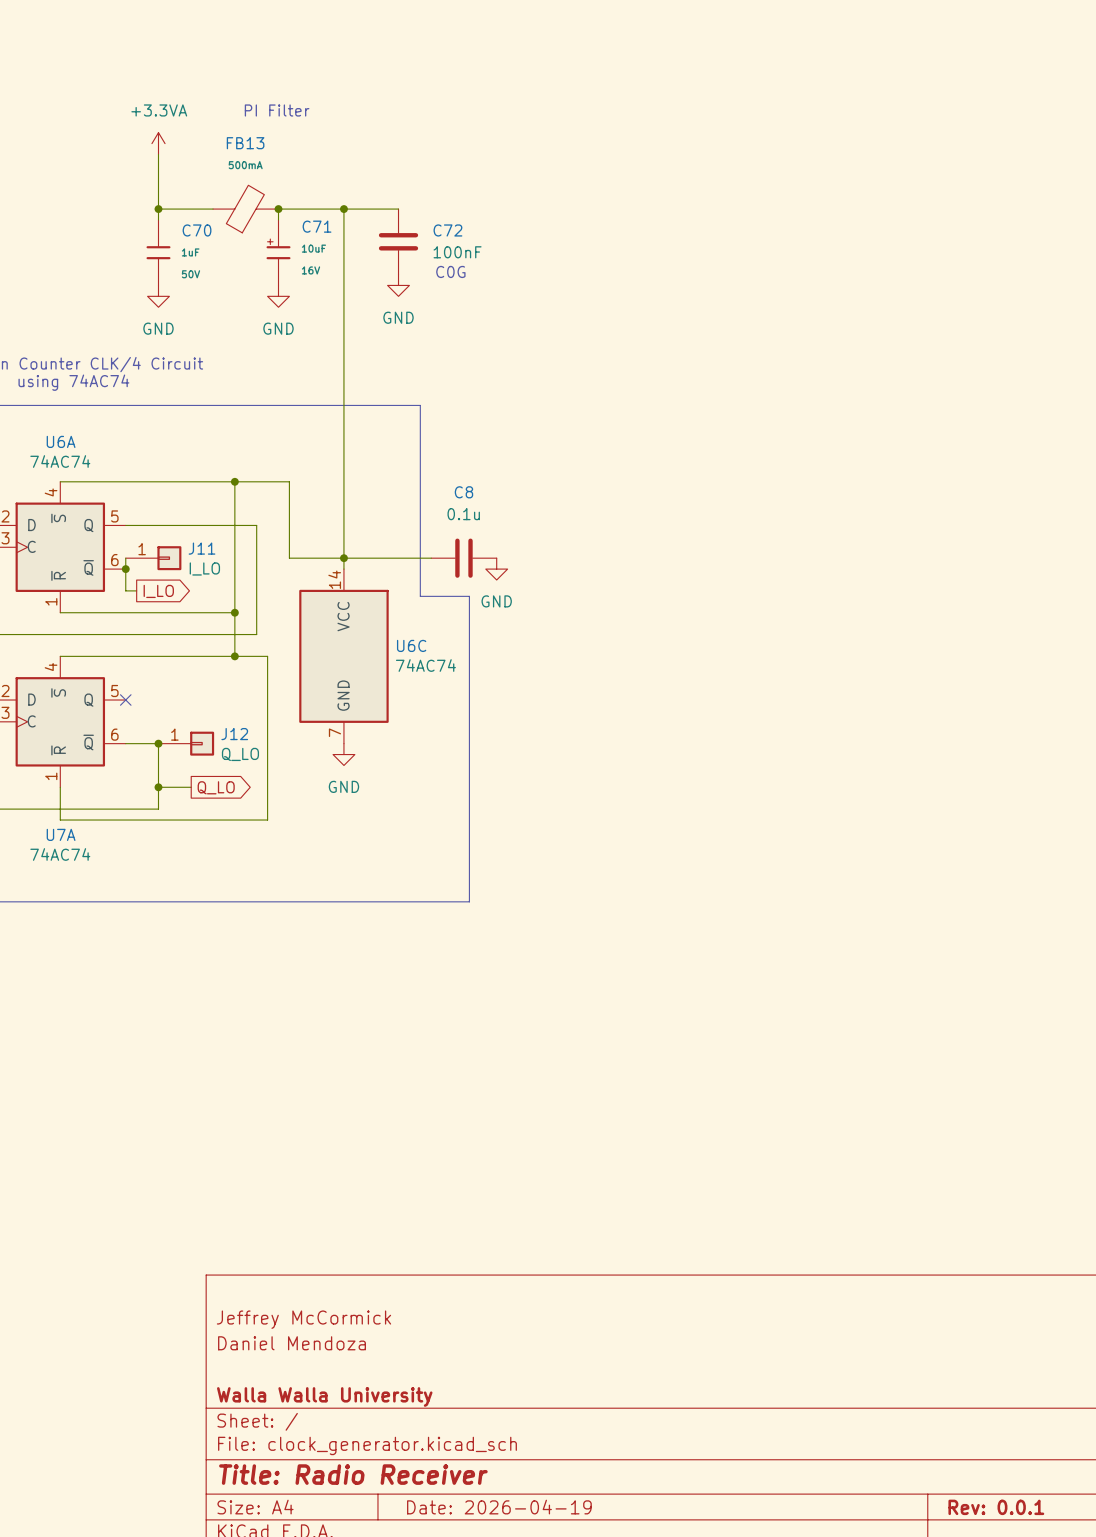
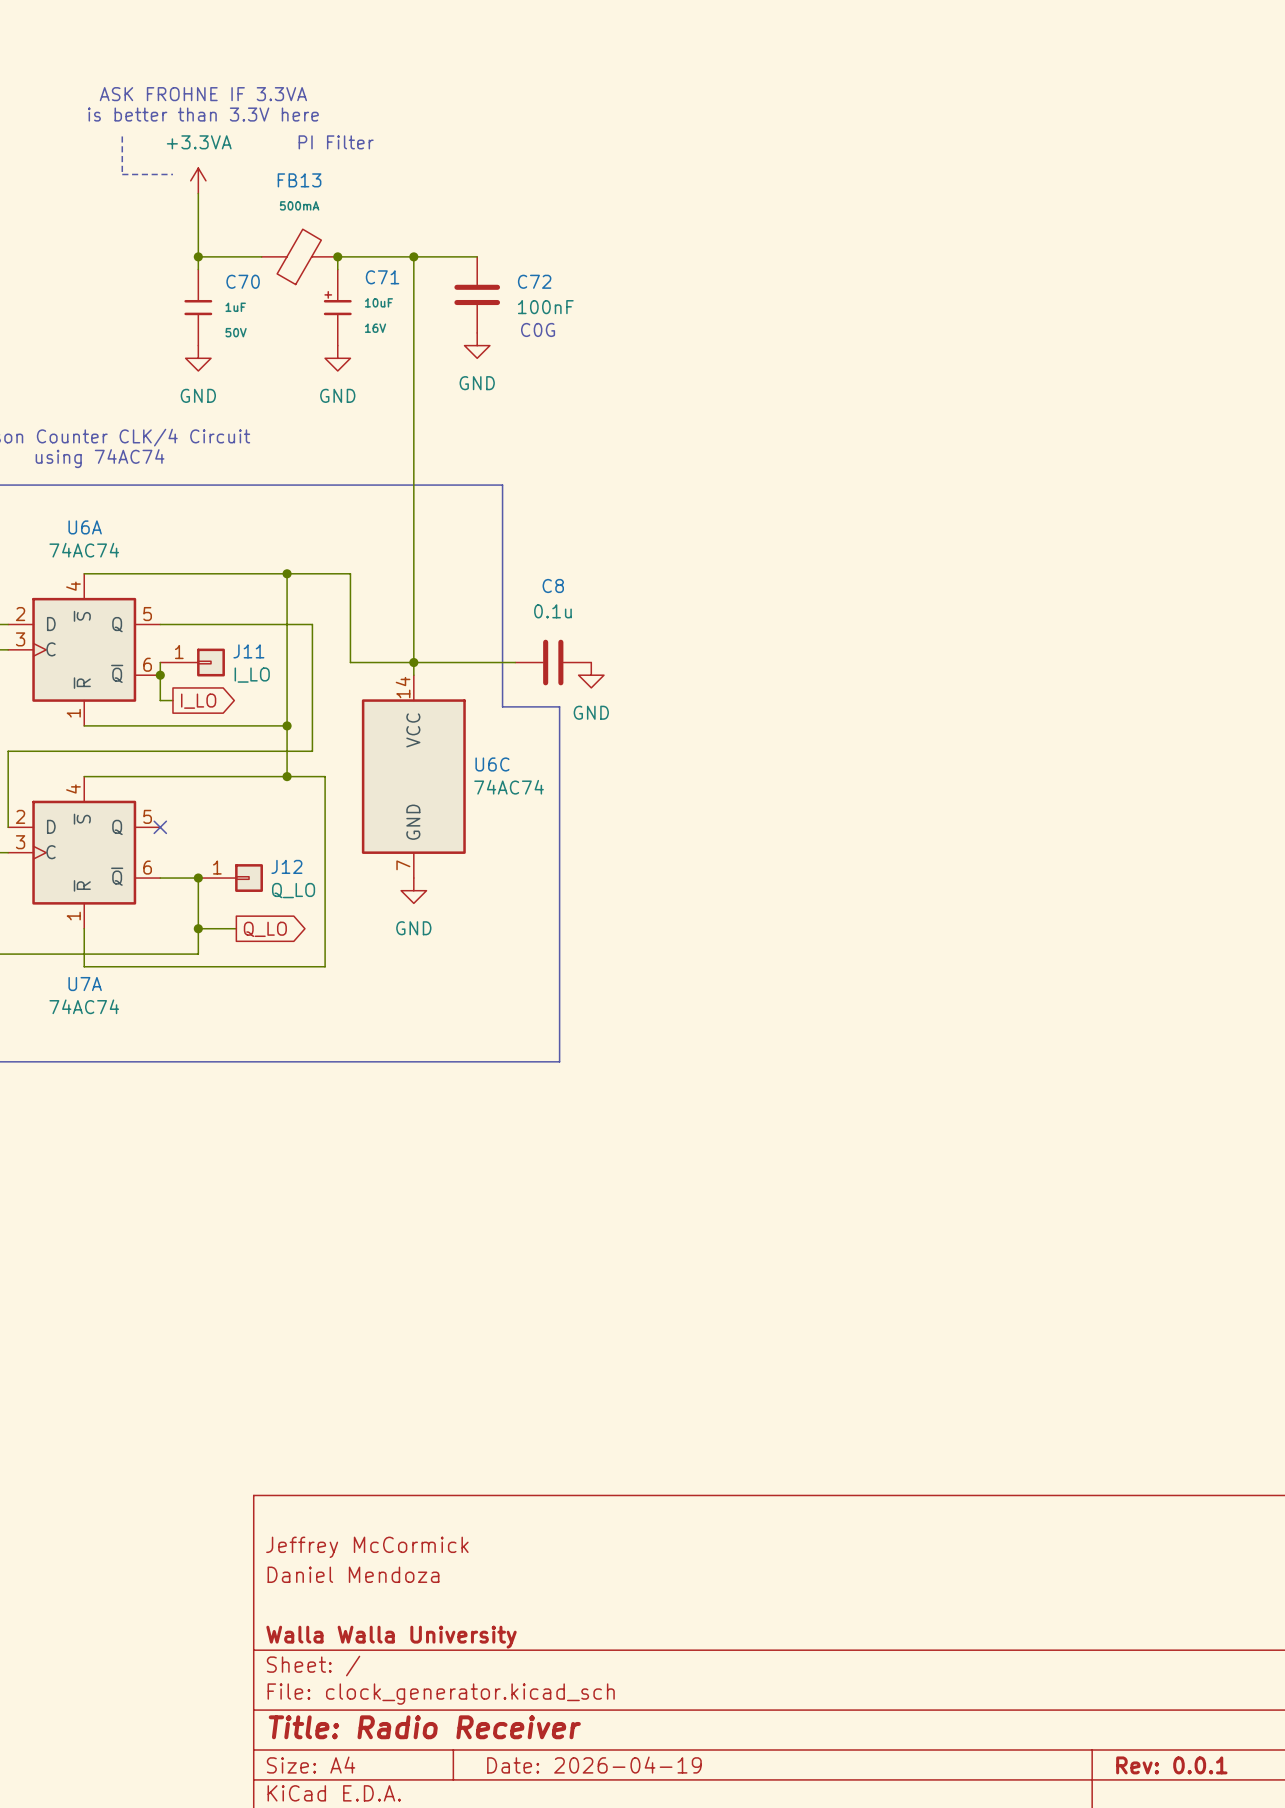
text: none -> ASK FROHNE IF 3.3VA (203, 94)
text: none -> is better than 3.3V here (203, 114)
line: none -> (122, 136) (122, 174) (172, 174)

